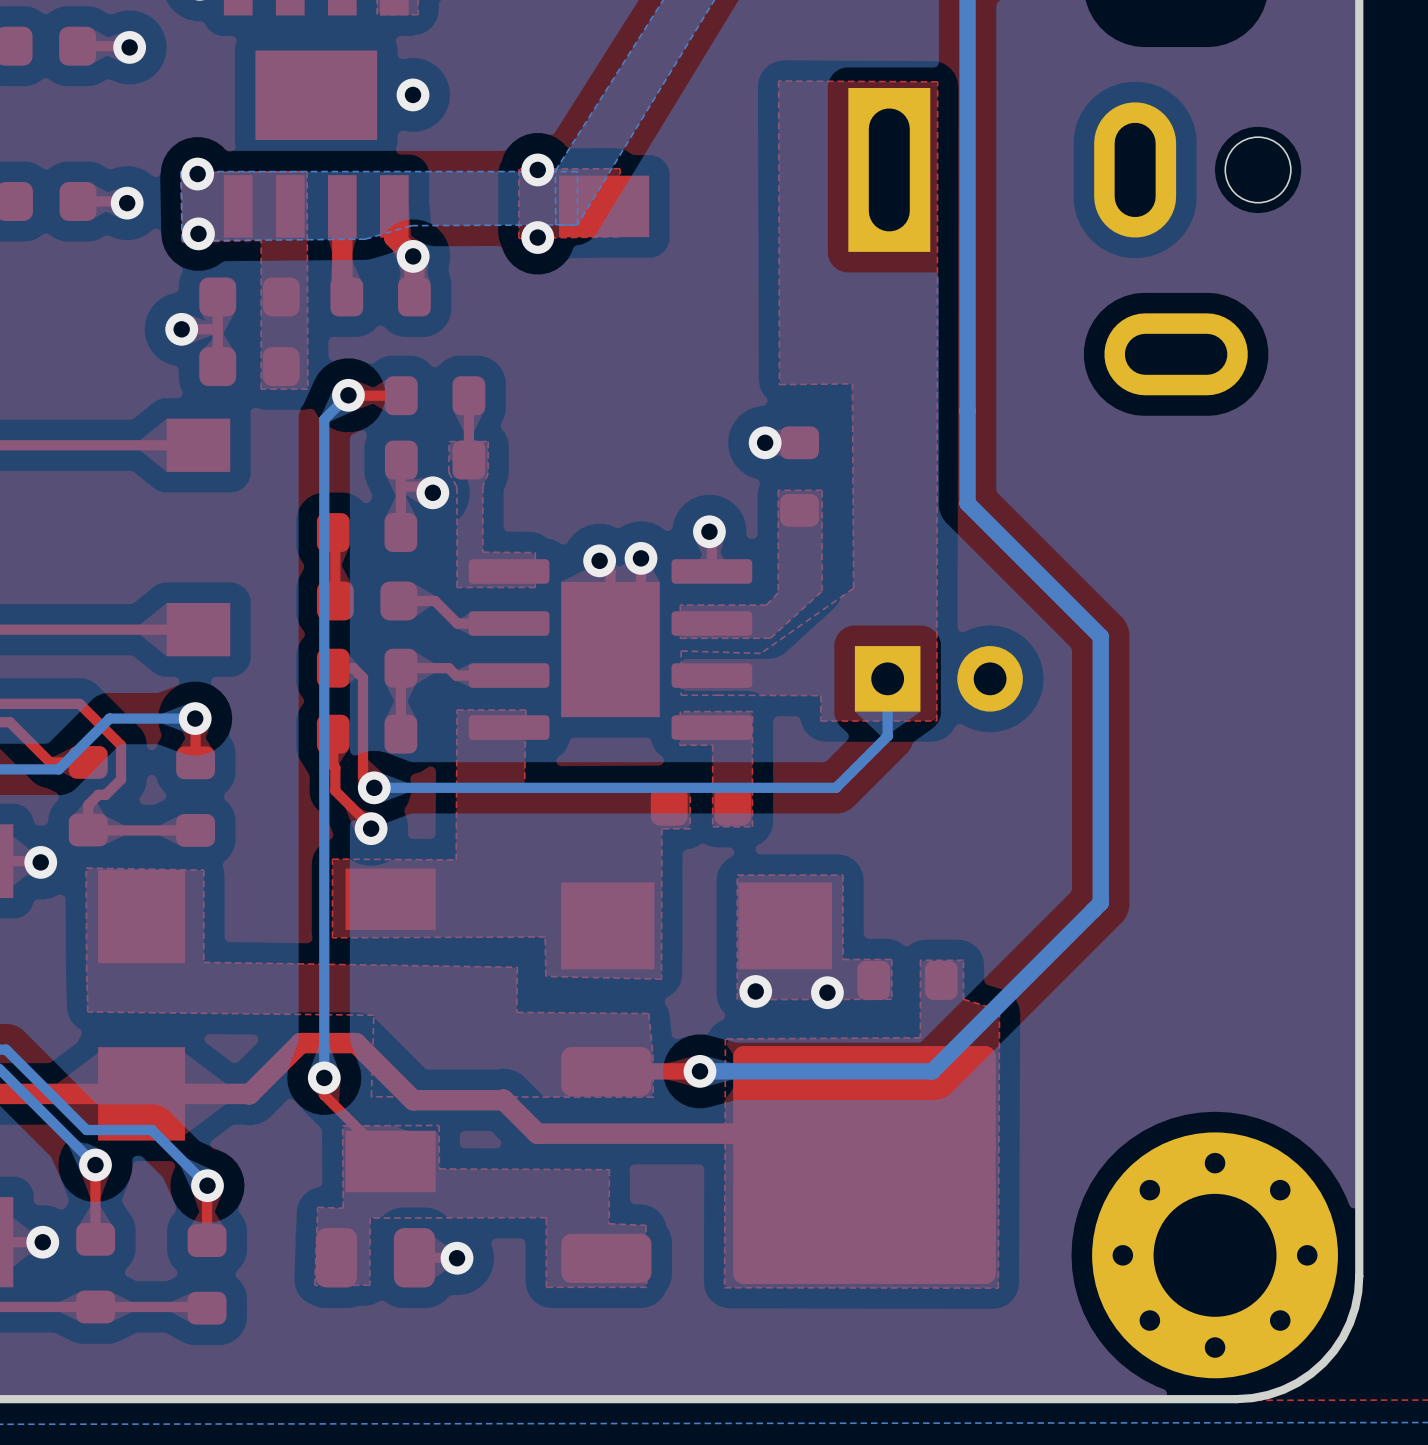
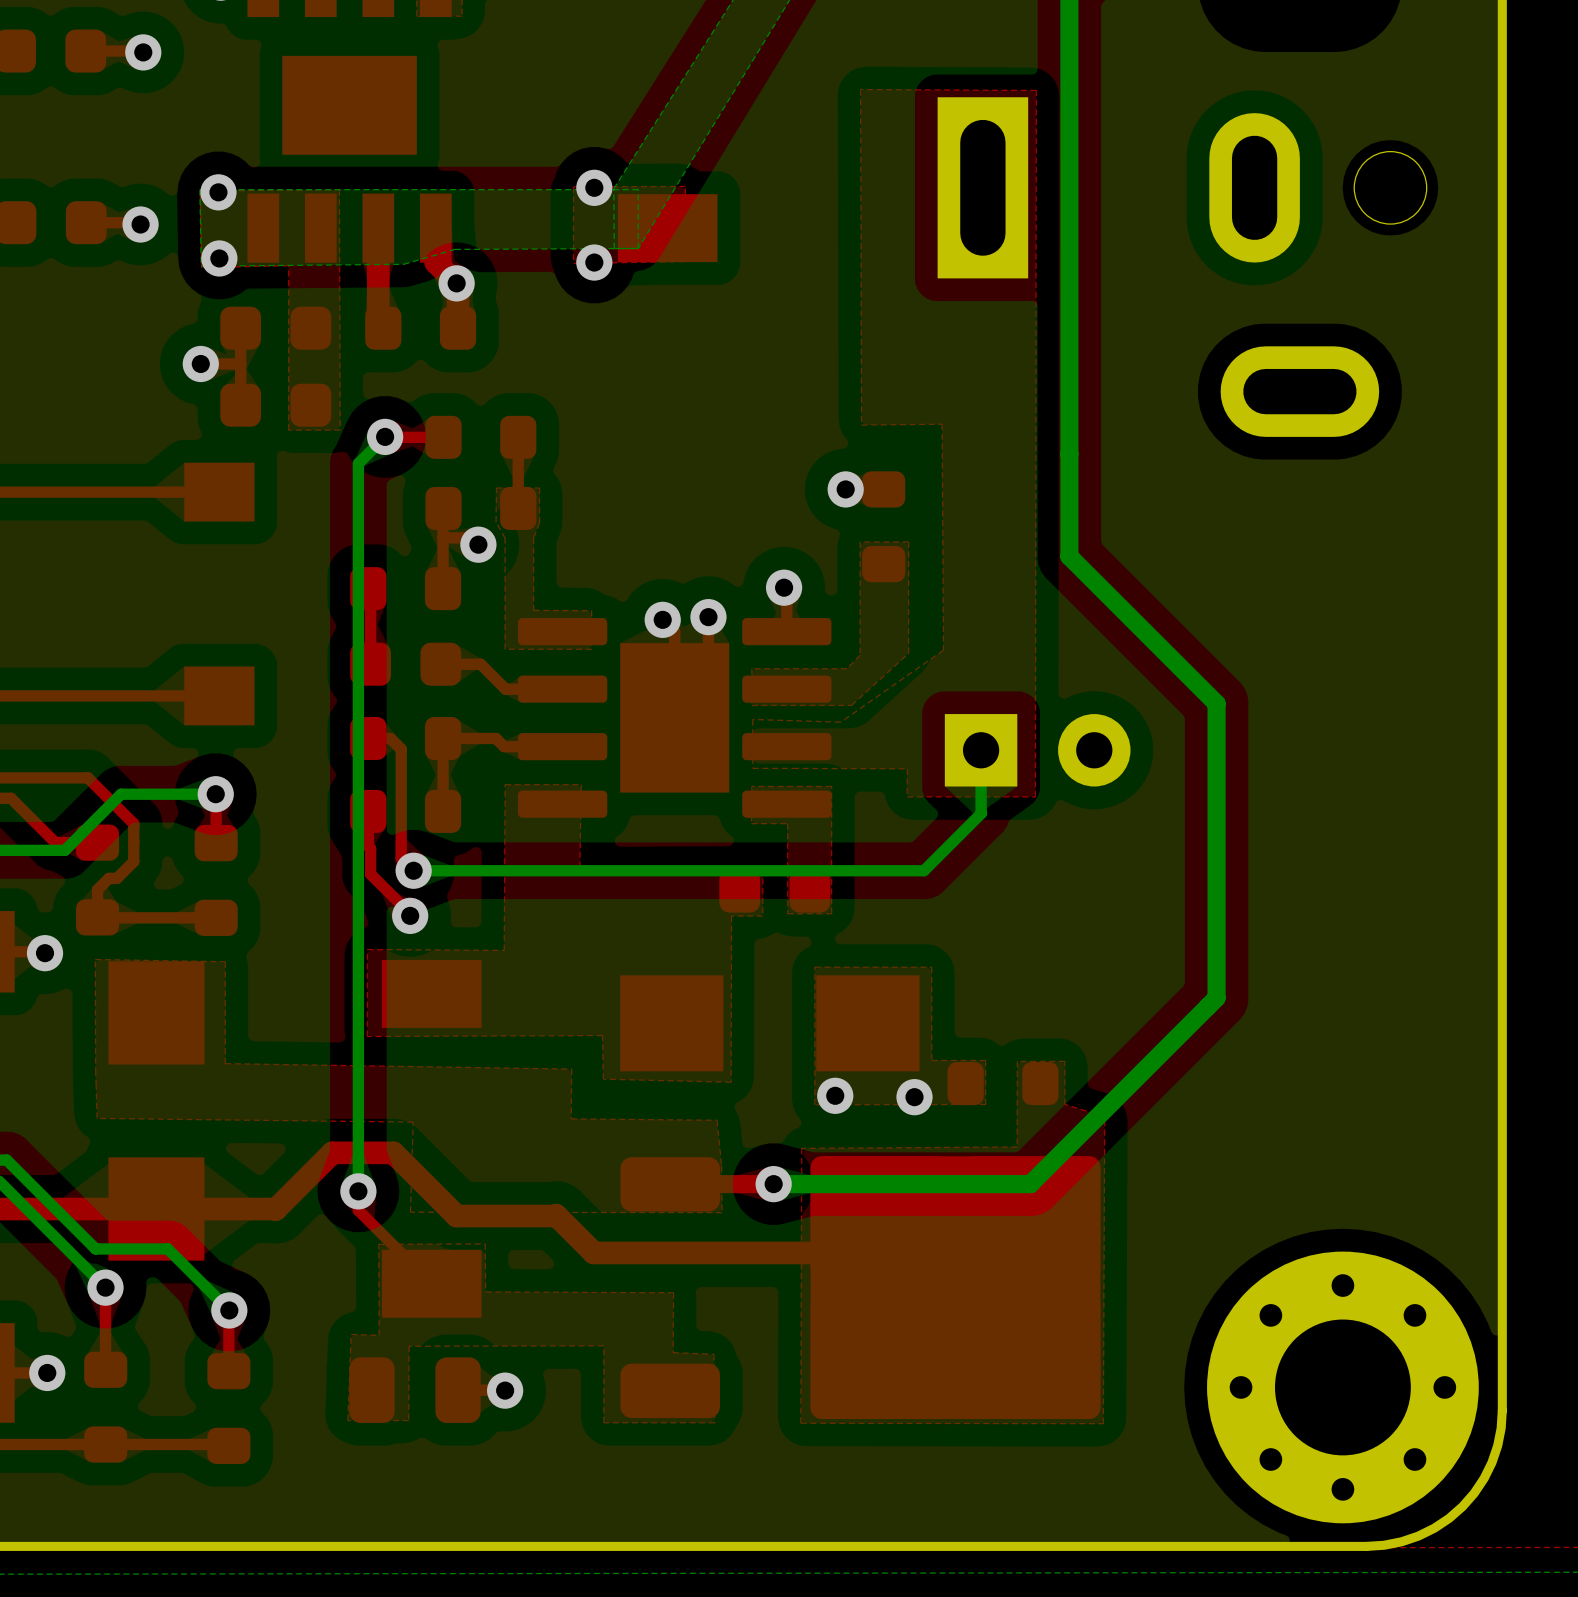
via: (413, 94) -> none

